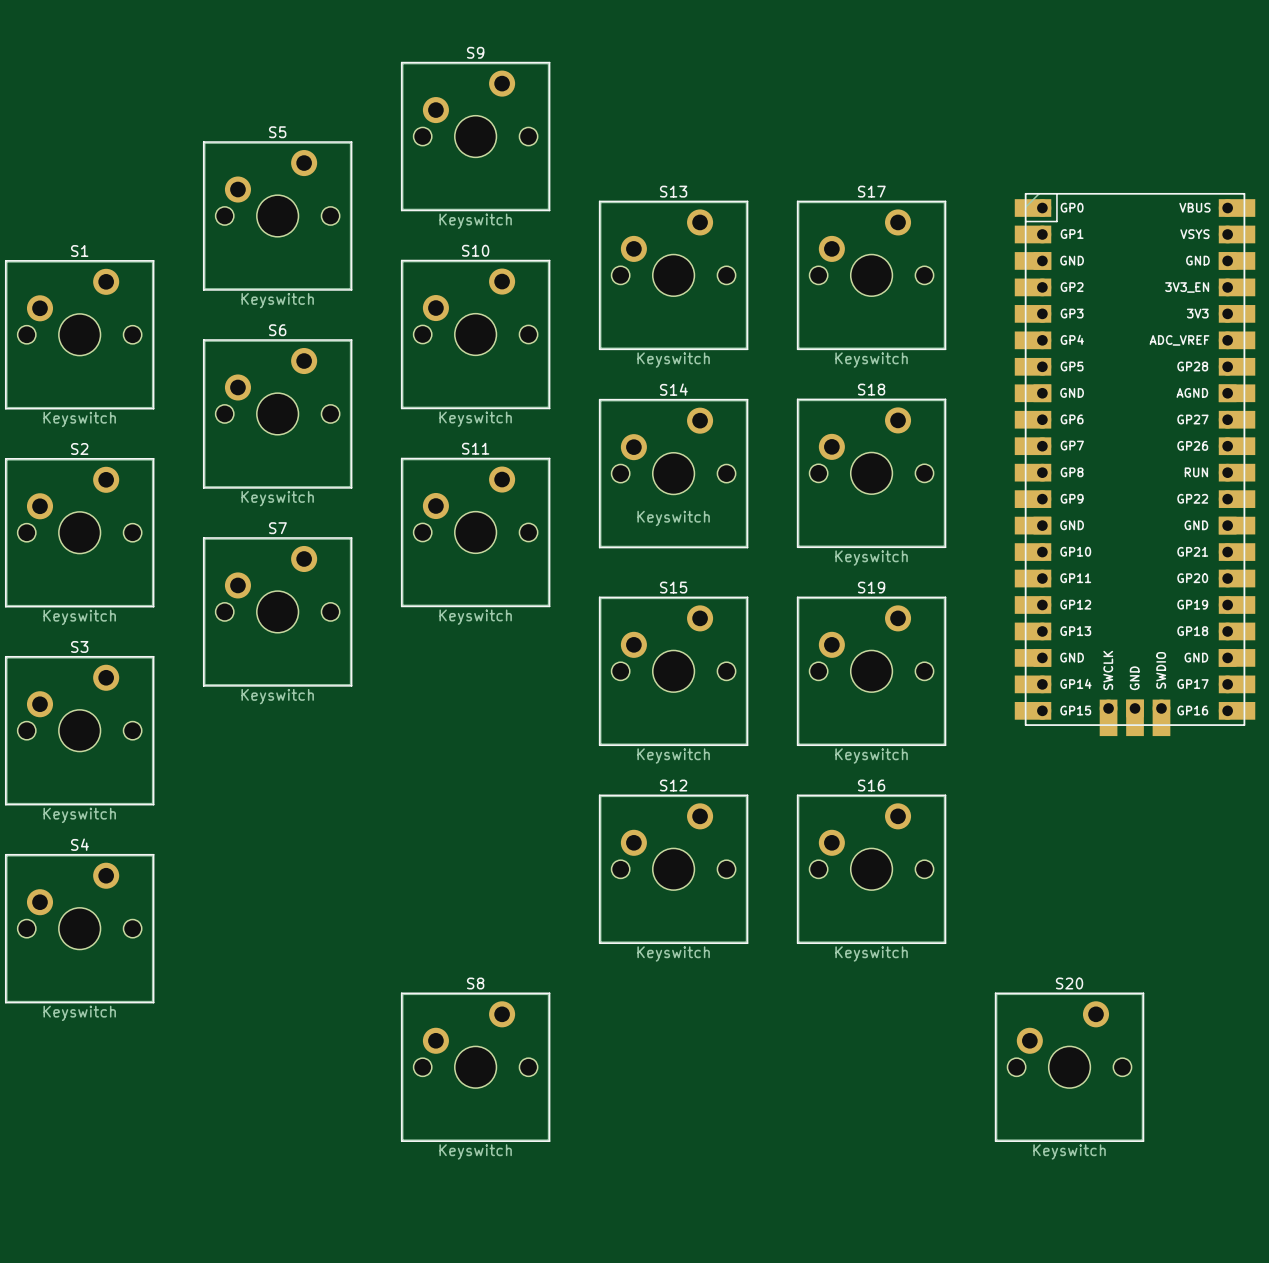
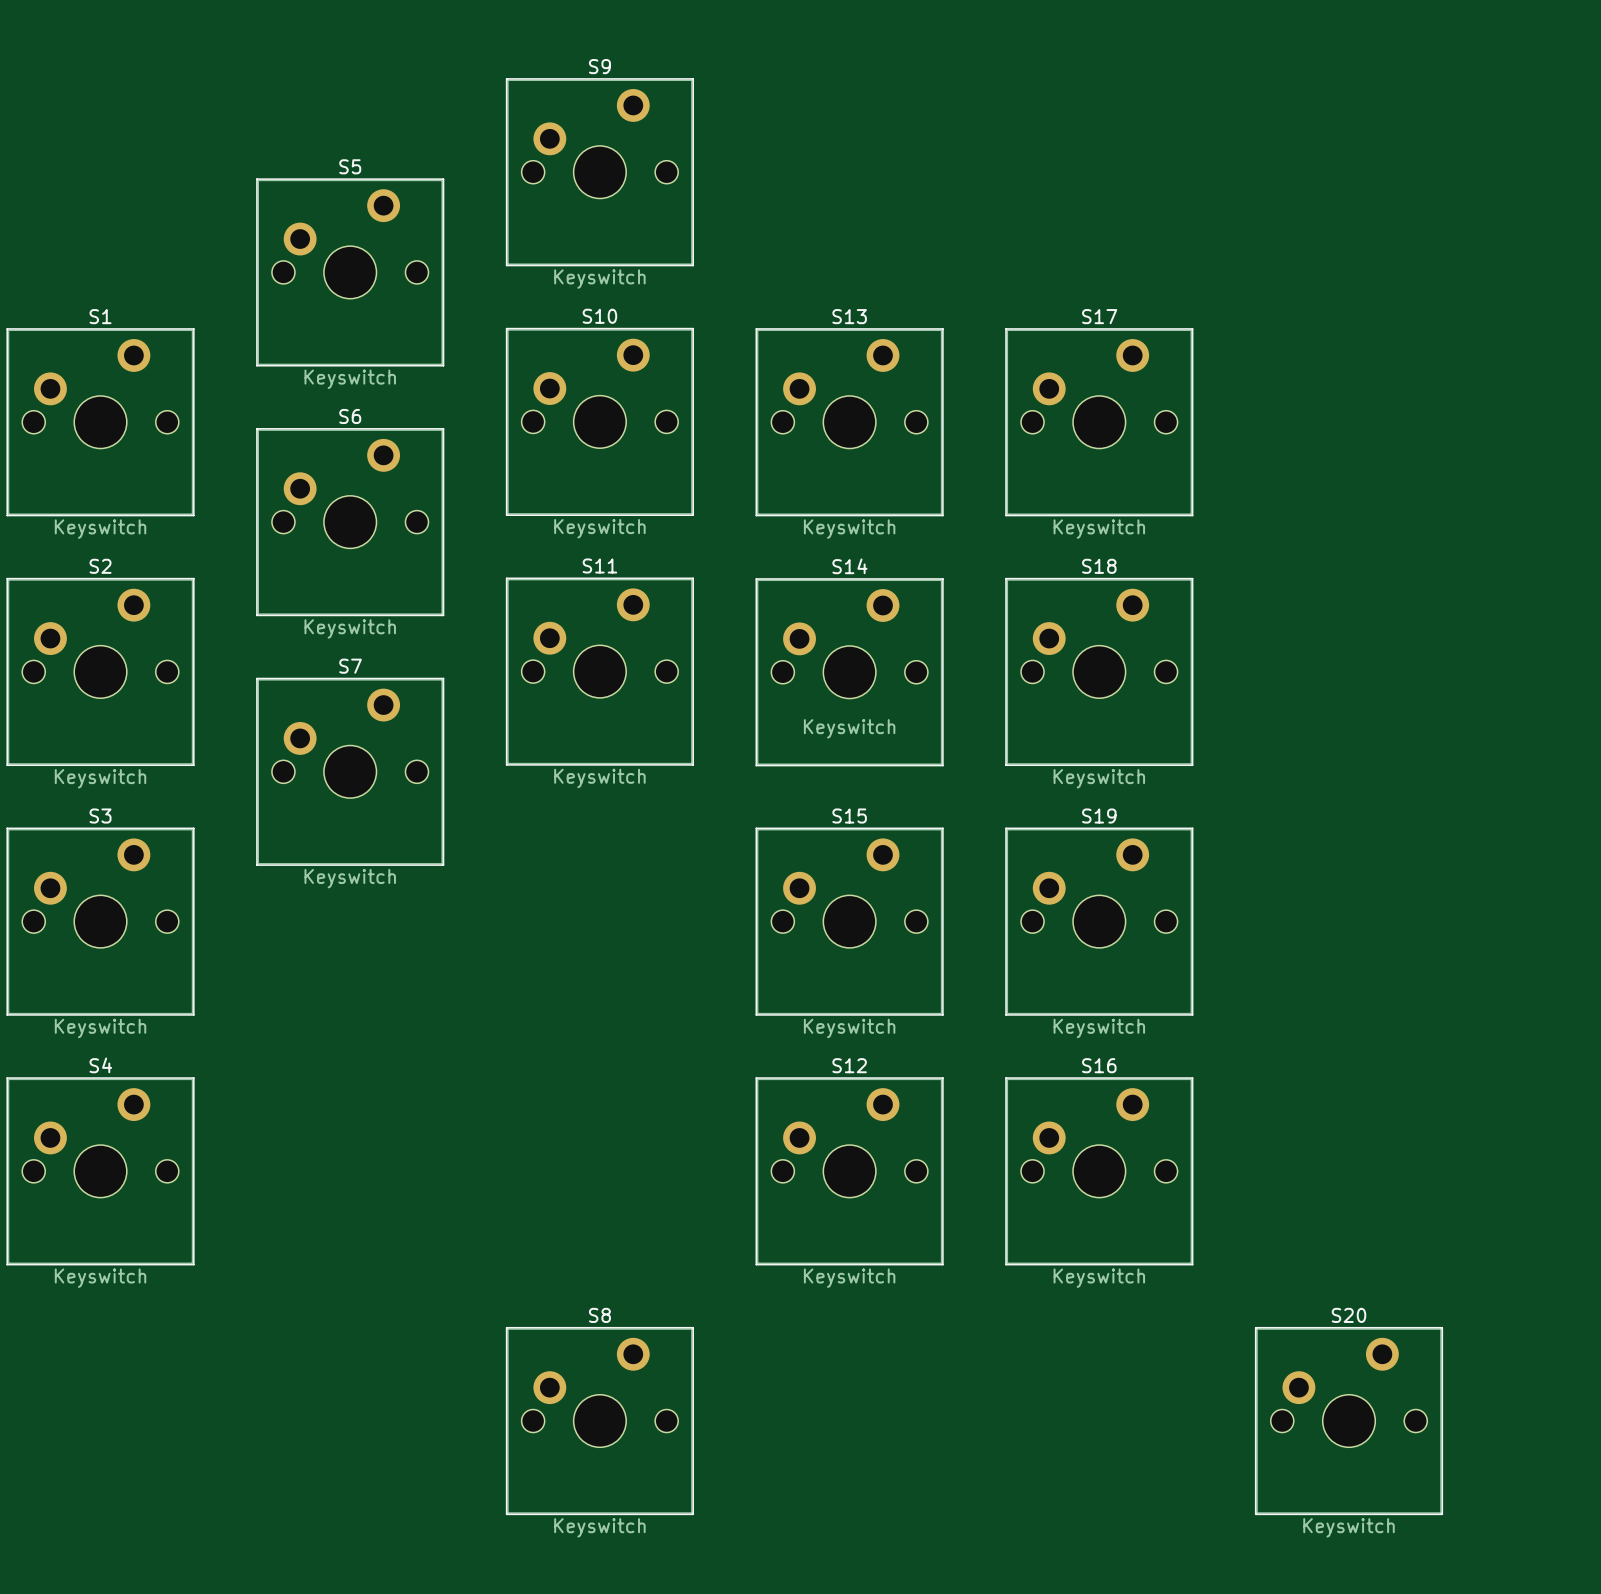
S13 position: (673, 275) -> (849, 422)
S17 position: (871, 275) -> (1099, 422)
part: (1135, 464) -> none
S14 position: (673, 473) -> (849, 672)
S18 position: (871, 473) -> (1099, 671)
S15 position: (673, 671) -> (849, 921)
S19 position: (871, 671) -> (1099, 921)
S12 position: (673, 869) -> (849, 1171)
S16 position: (871, 869) -> (1099, 1171)
S8 position: (475, 1067) -> (599, 1421)
S20 position: (1069, 1067) -> (1349, 1421)

